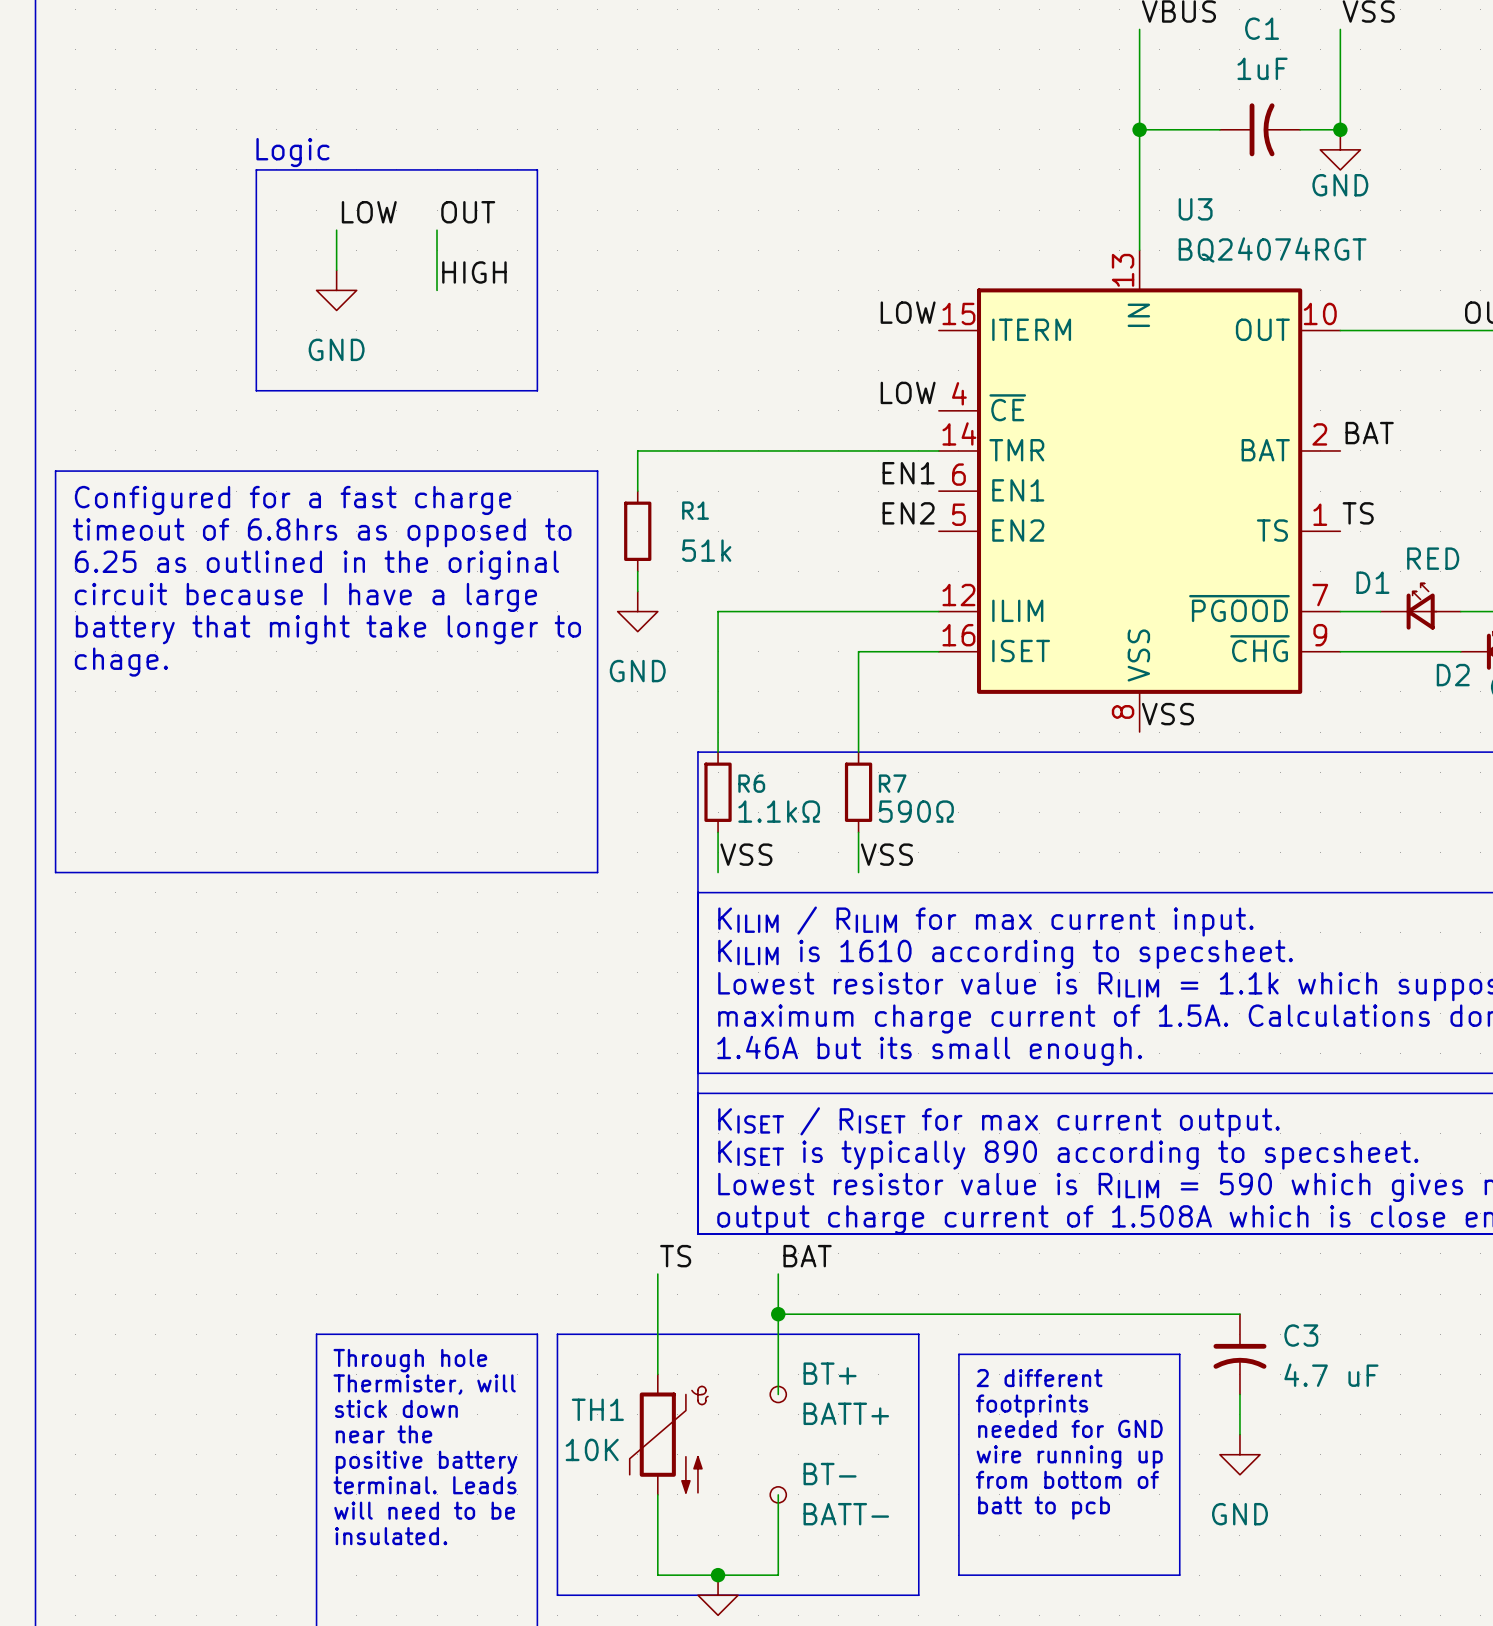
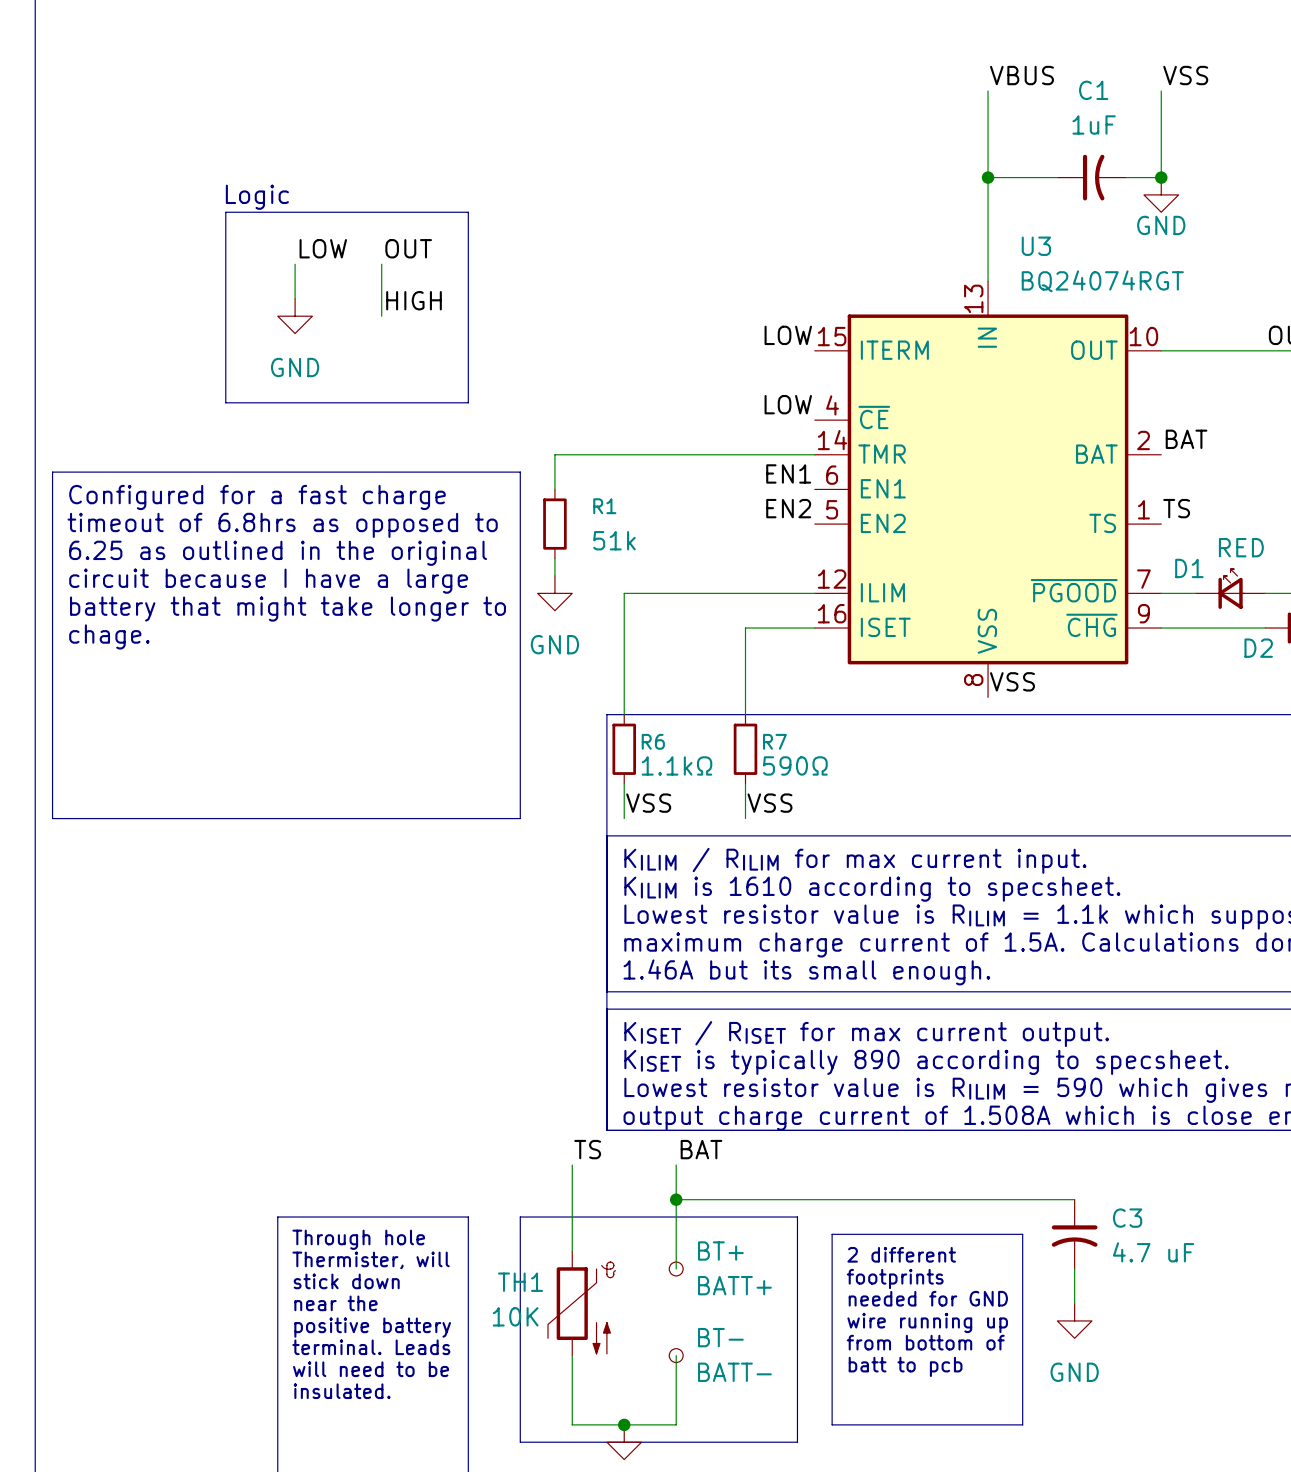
line: (597, 1334) (557, 1334) (557, 1595) (597, 1595) -> (520, 1217) (520, 1442)

